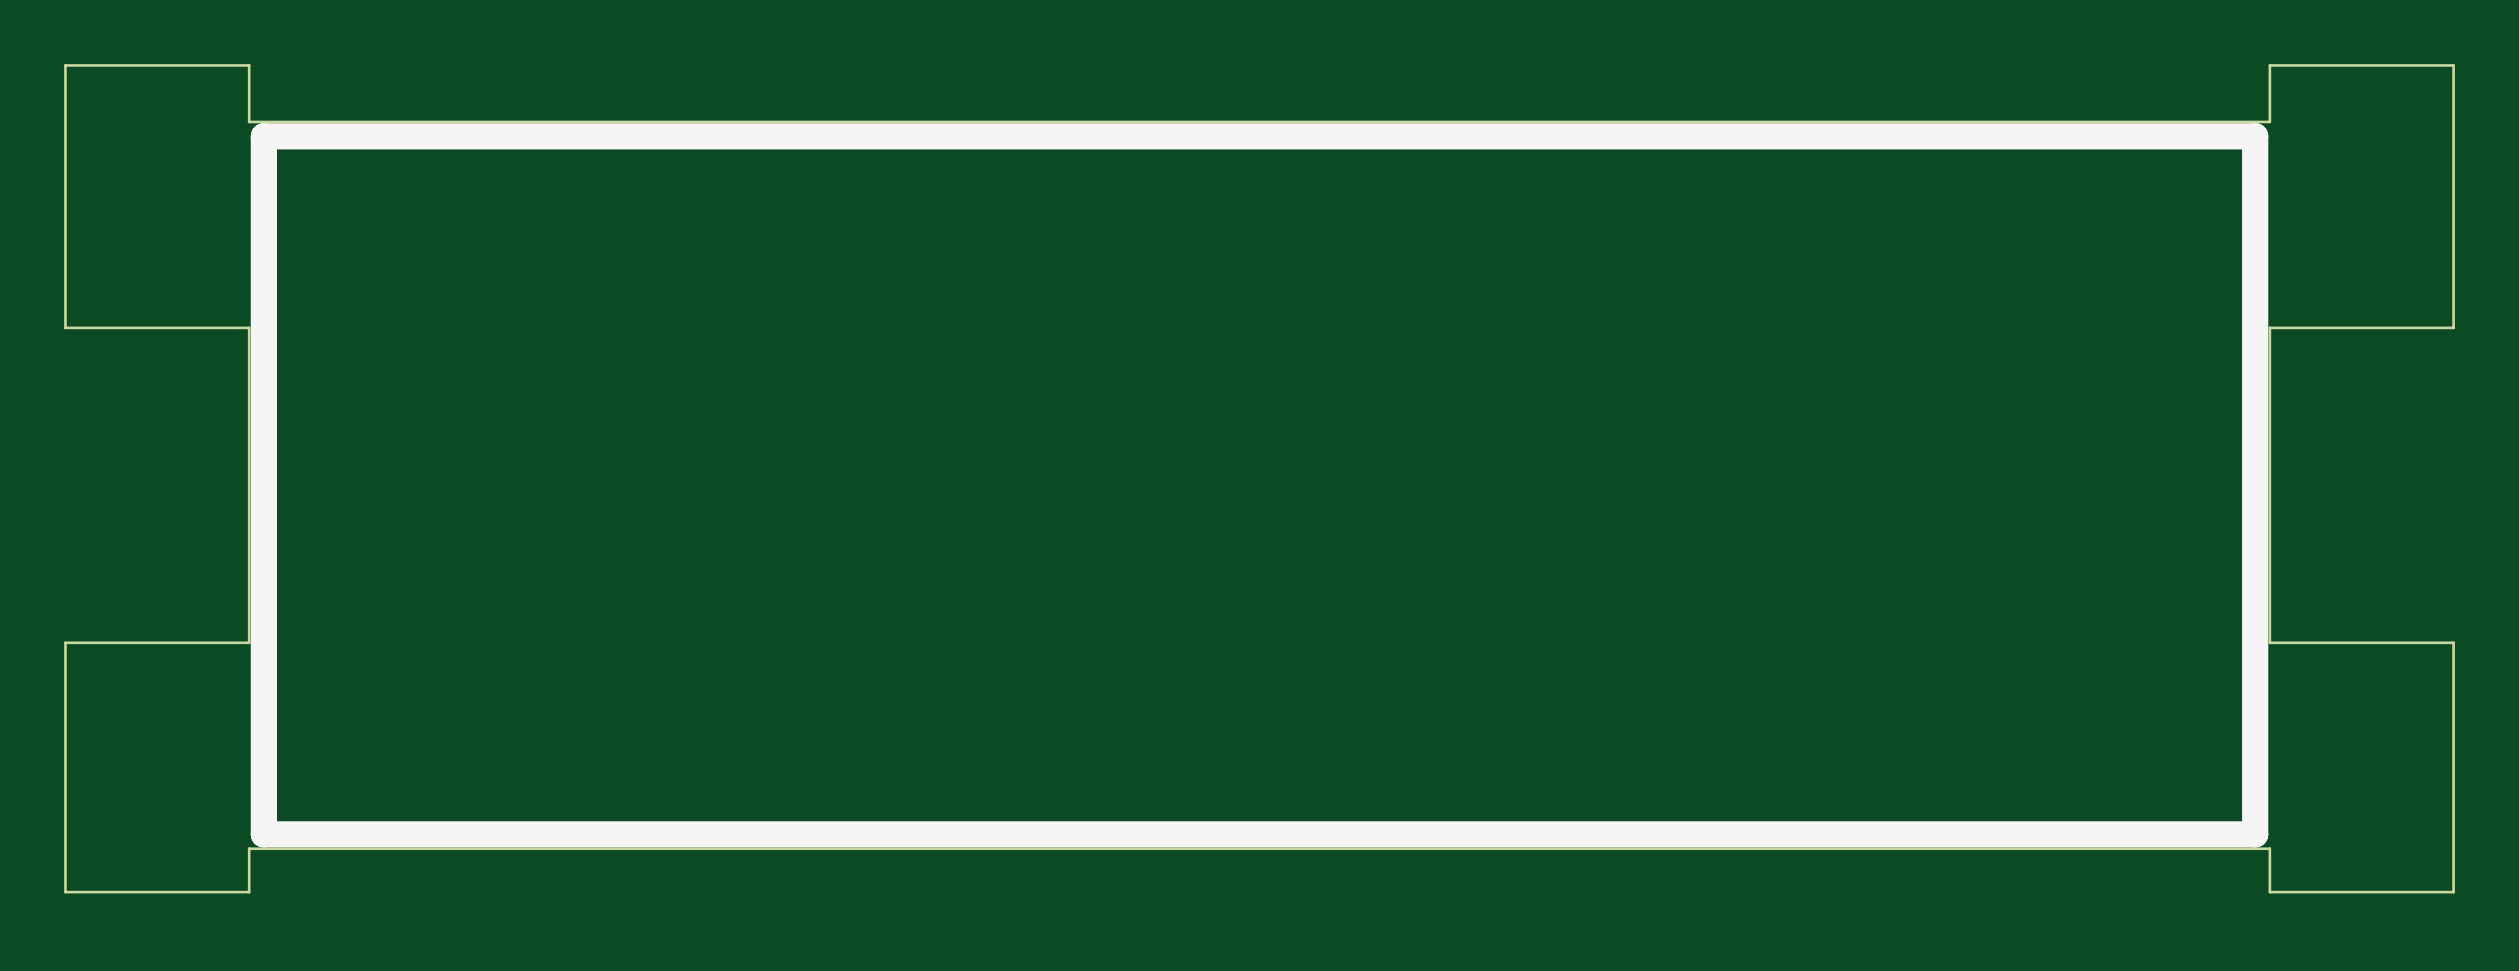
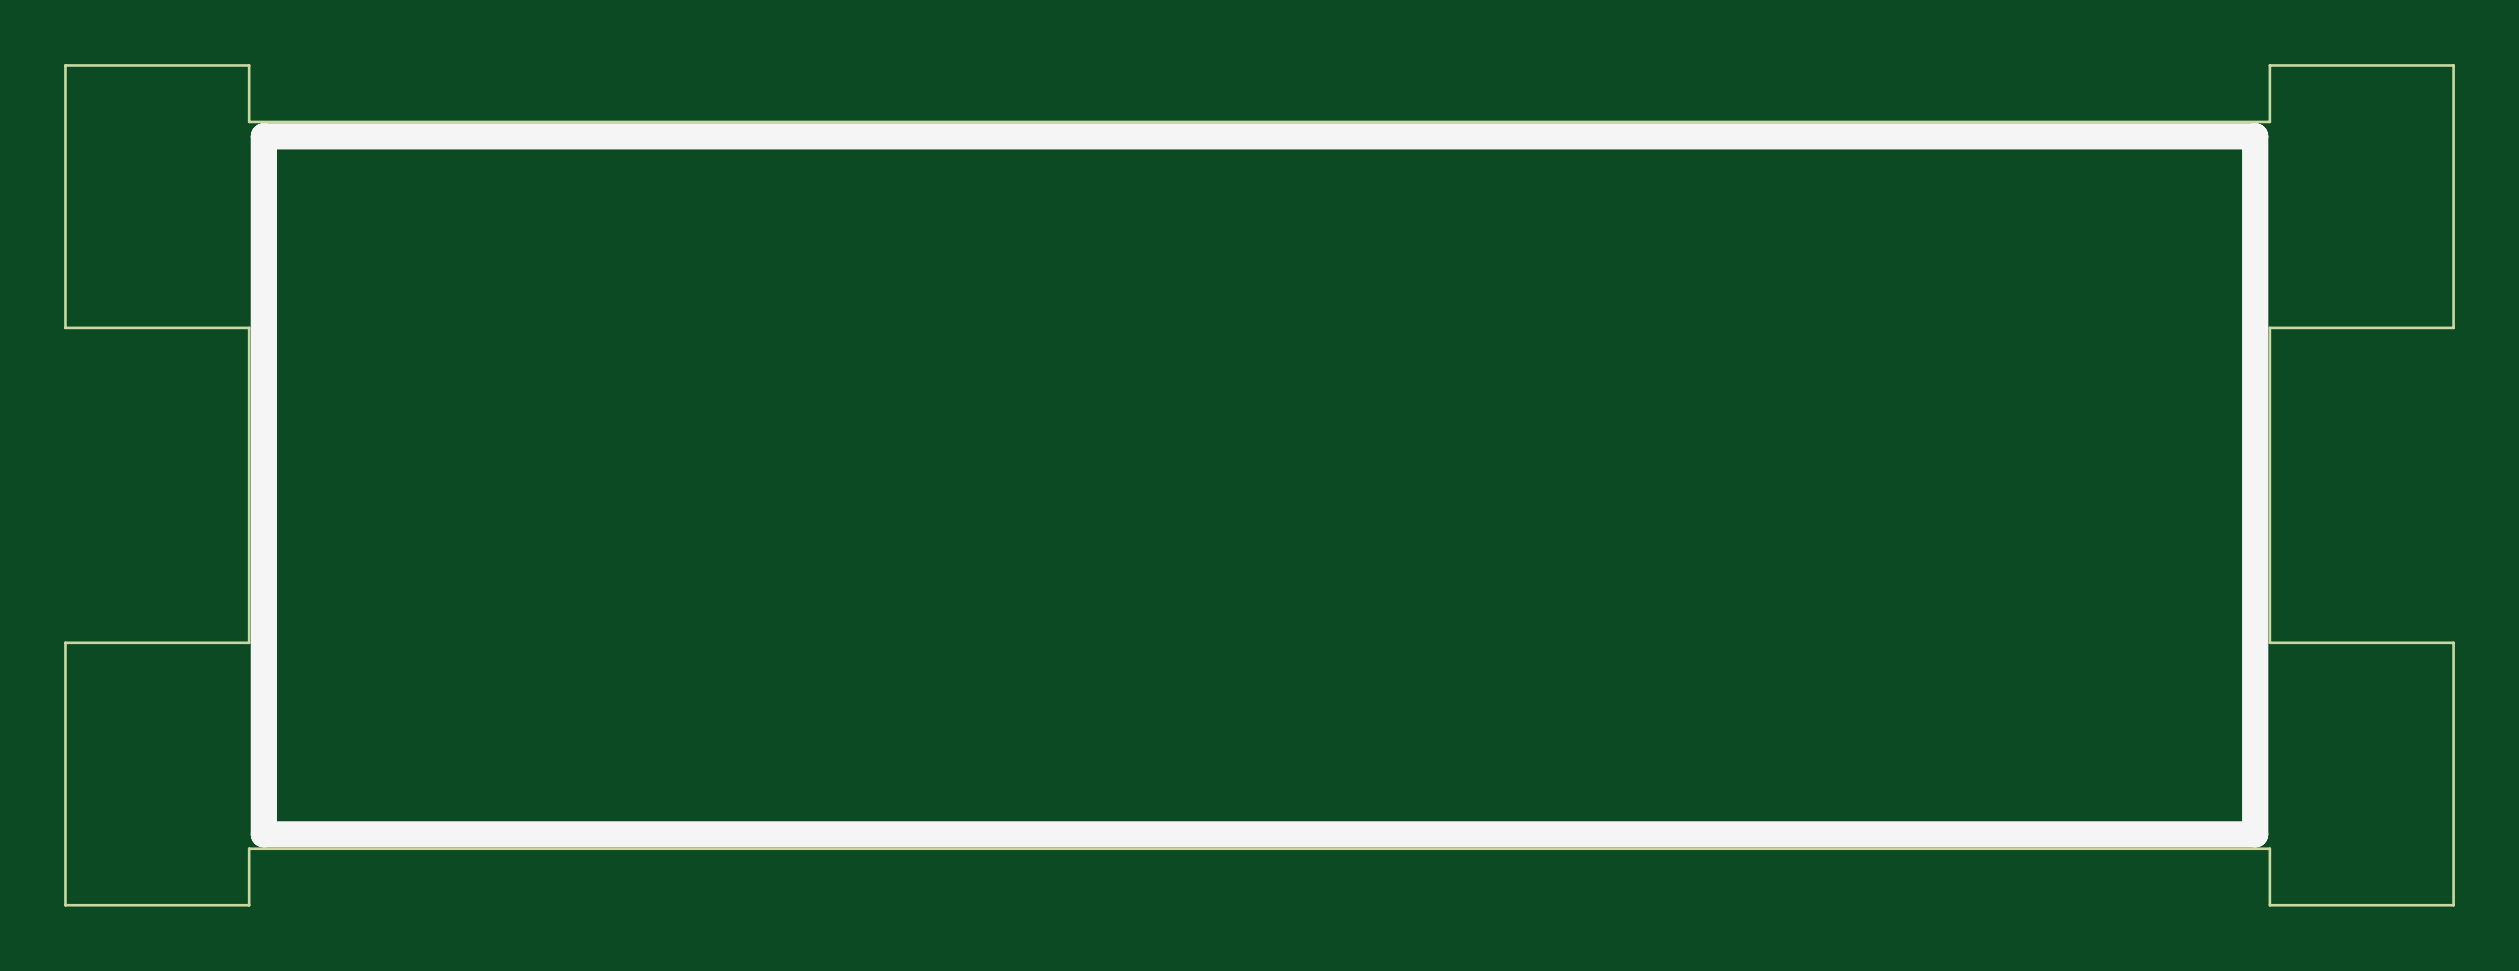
drawing shape: [64, 64, 2455, 894] -> [64, 64, 2455, 907]

